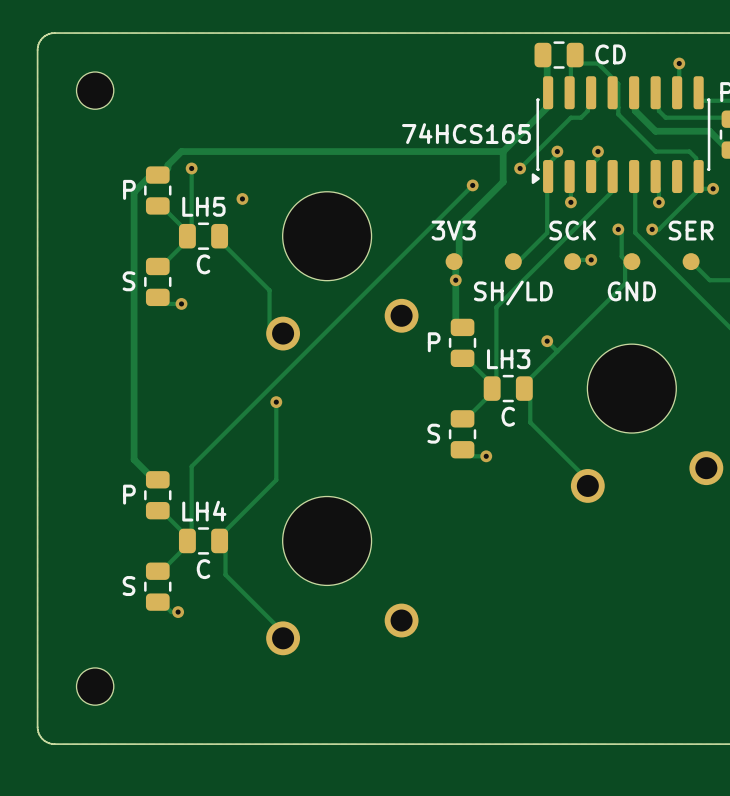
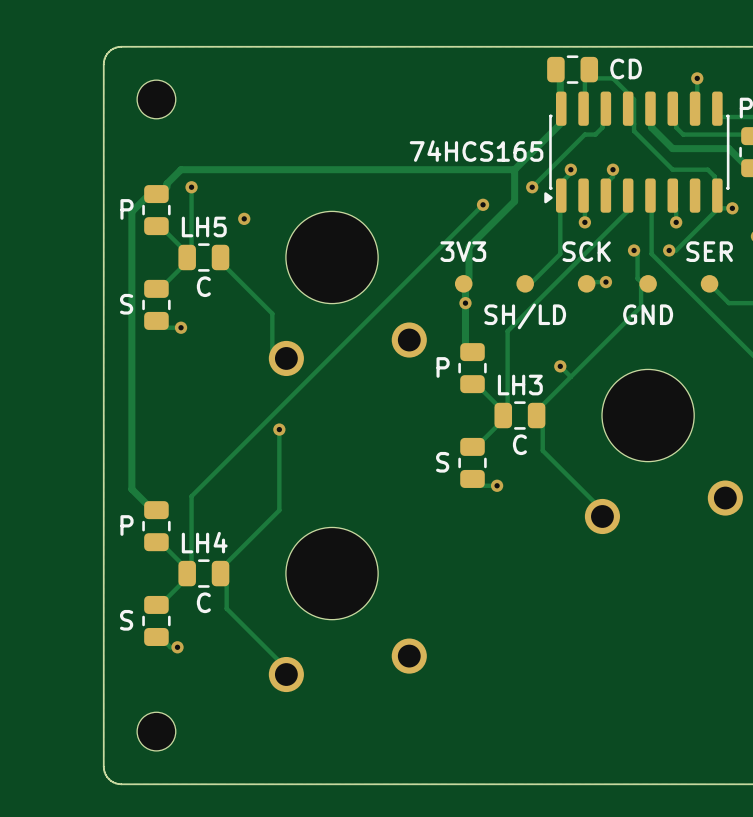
board edge: (123, 33) (51, 33) (40, 40) (37, 49) (37, 729) (42, 739) (51, 743) (123, 744) -> (121, 46) (108, 51) (103, 64) (103, 766) (108, 779) (121, 784)
part position: (95, 90) -> (156, 99)
part position: (95, 686) -> (156, 731)

